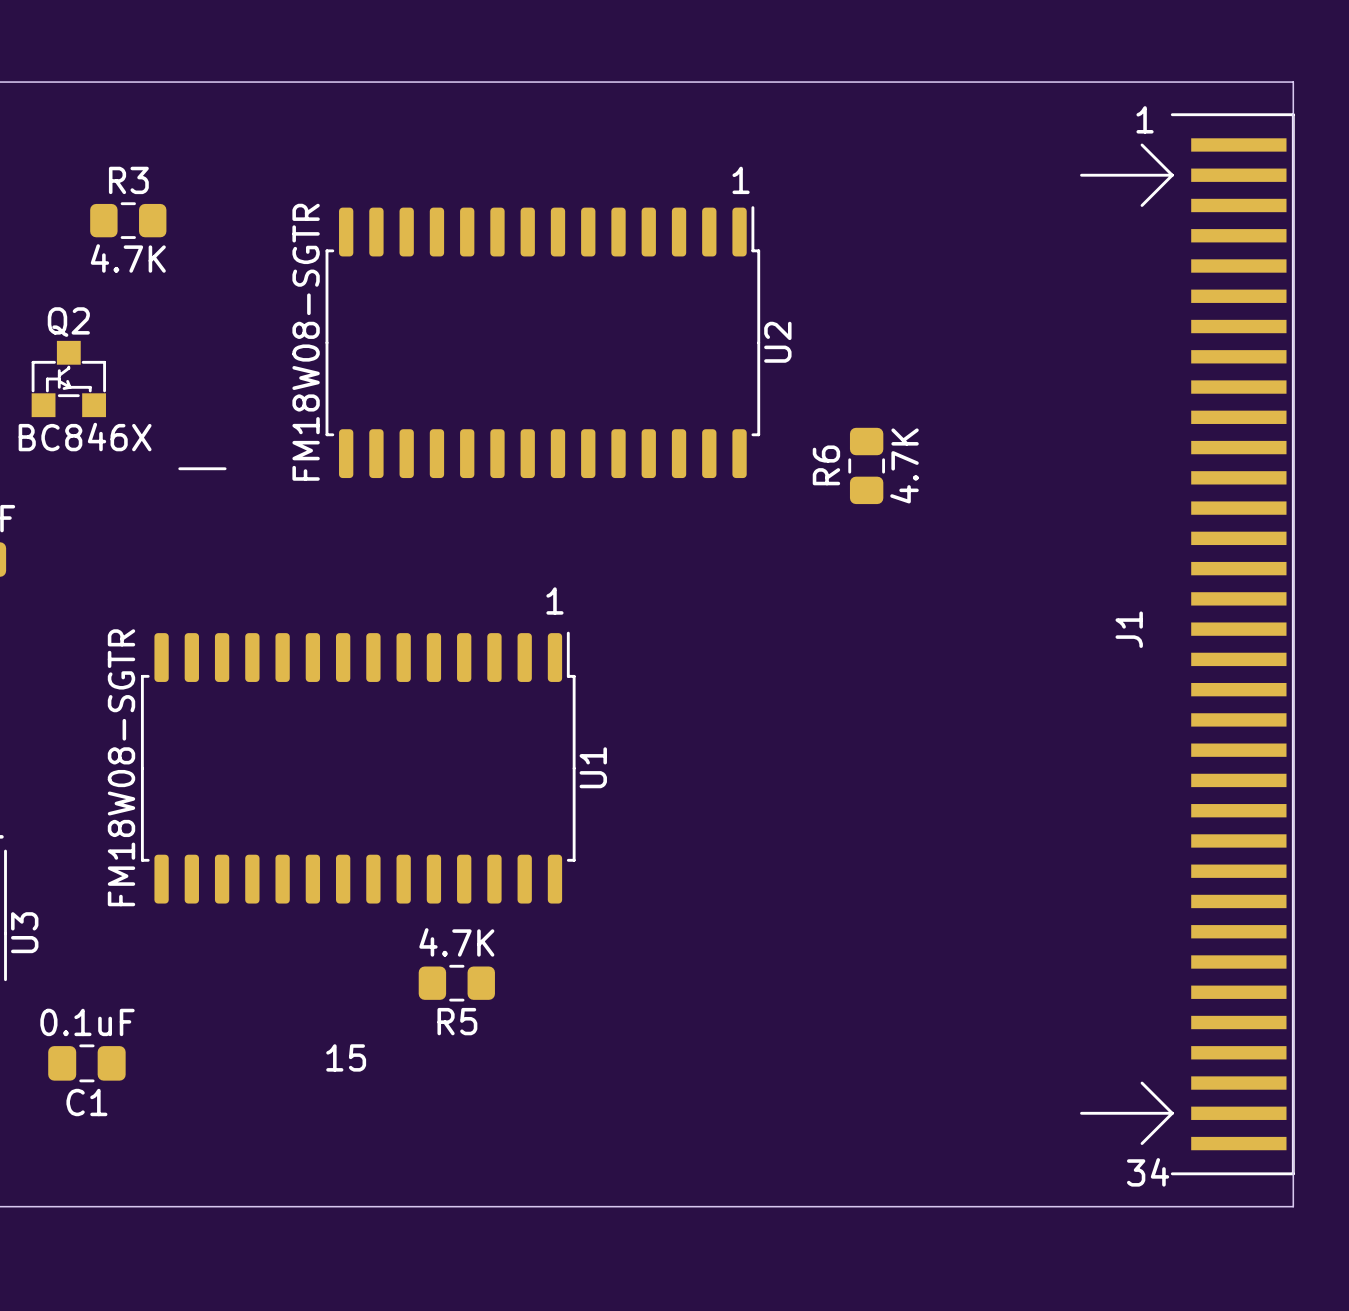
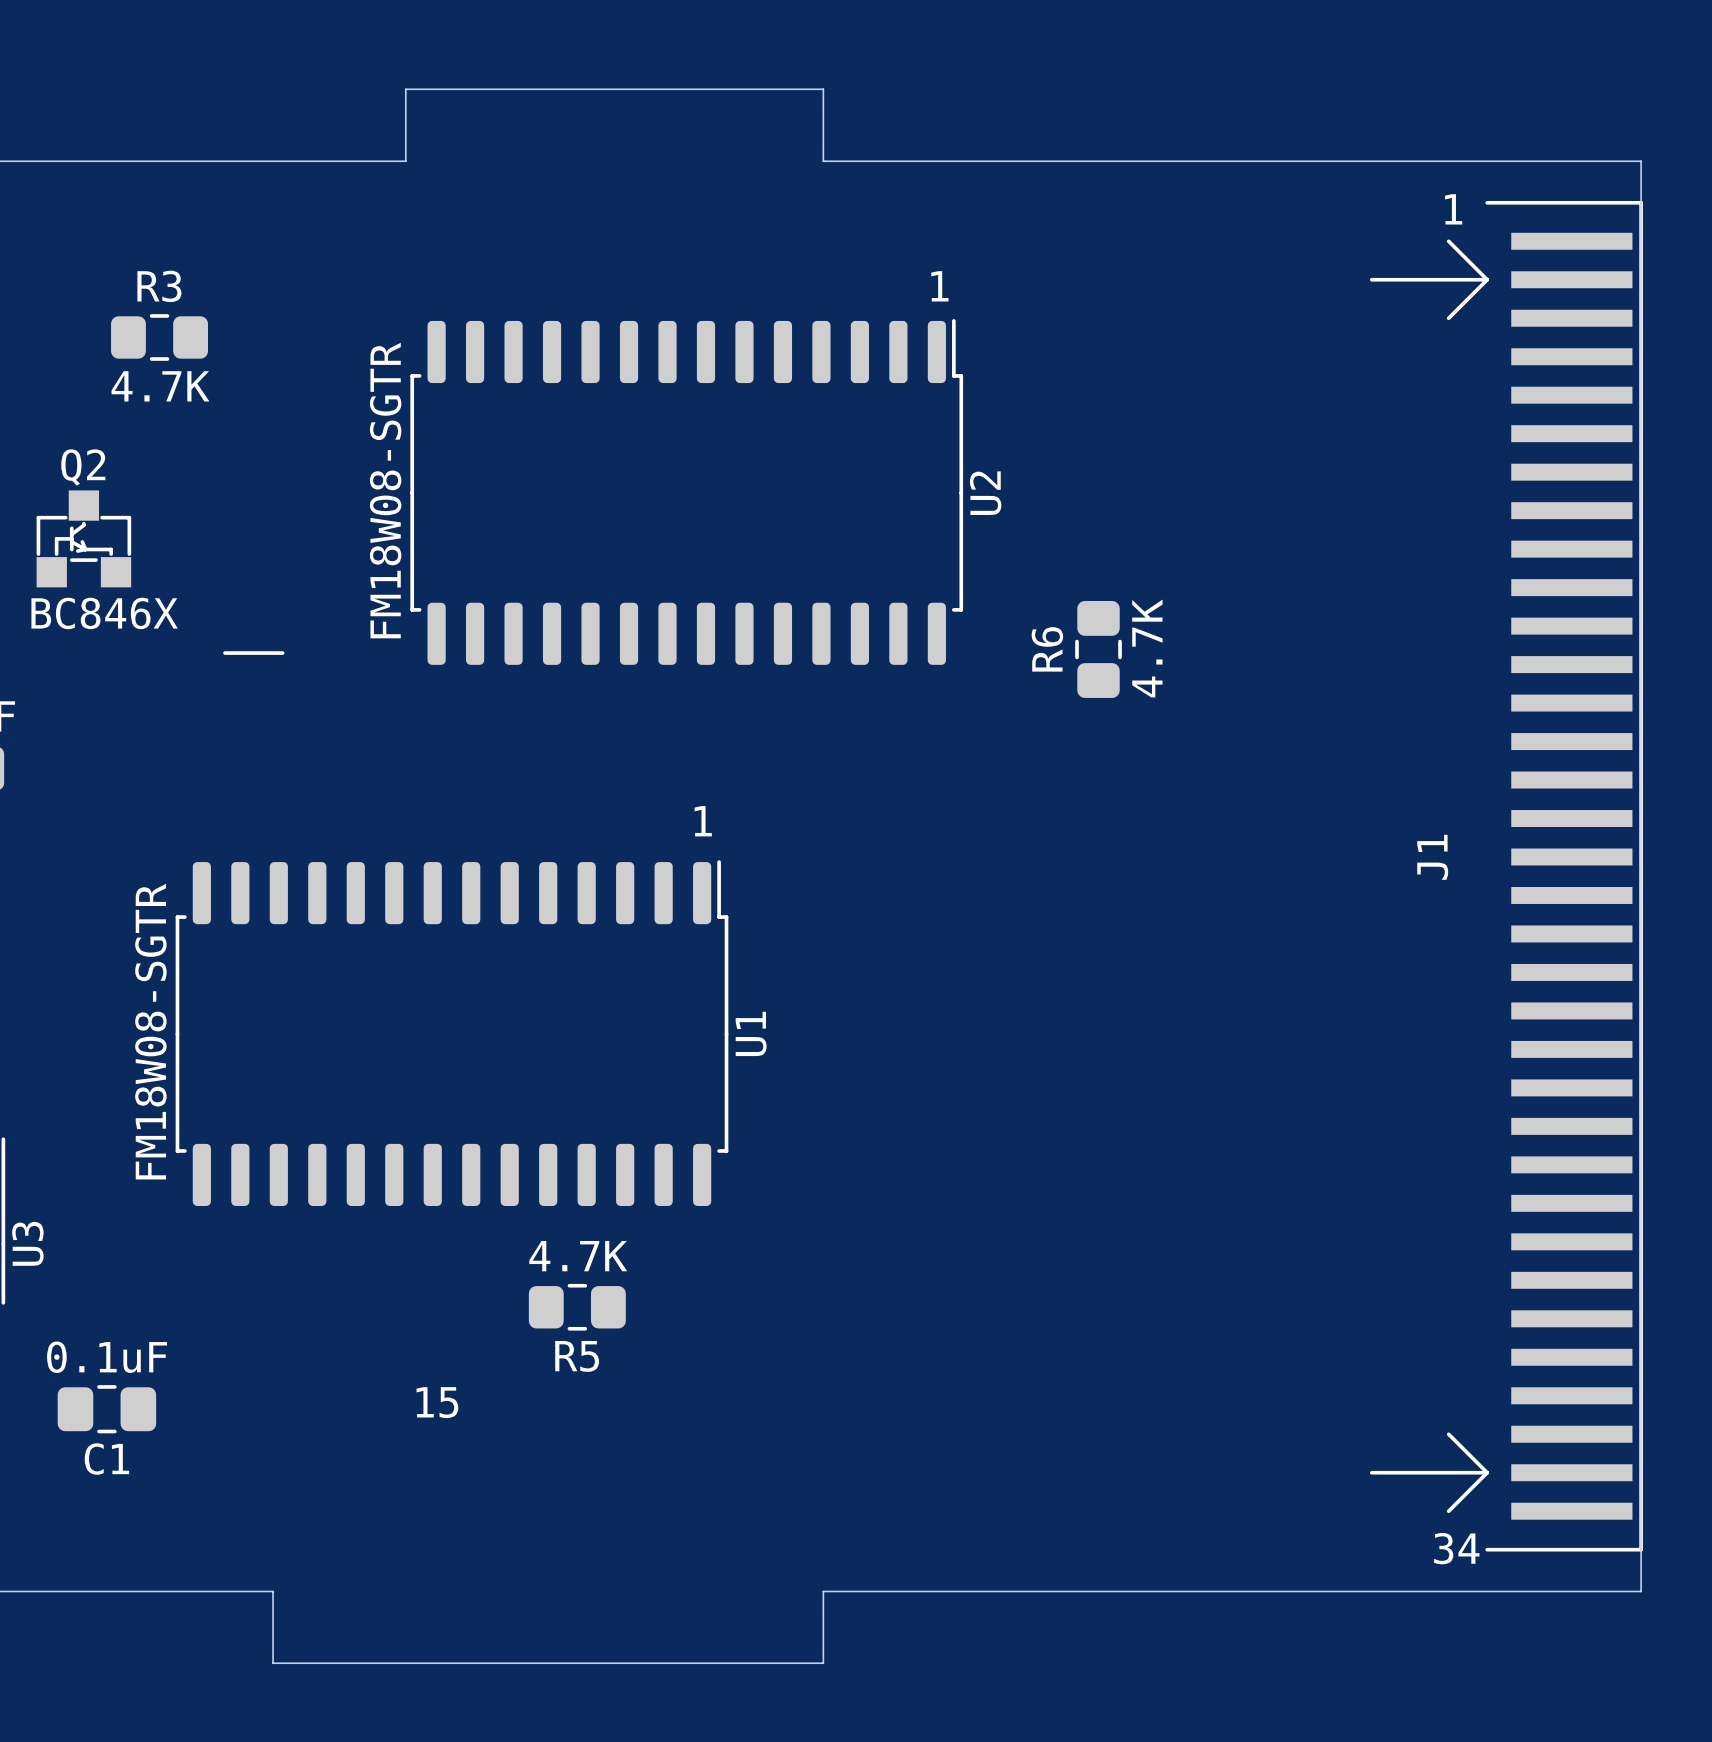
board edge: (321, 82) (650, 82) -> (405, 161) (405, 89) (823, 89) (823, 161)
board edge: (217, 1206) (650, 1206) -> (273, 1591) (273, 1663) (823, 1663) (823, 1591)

